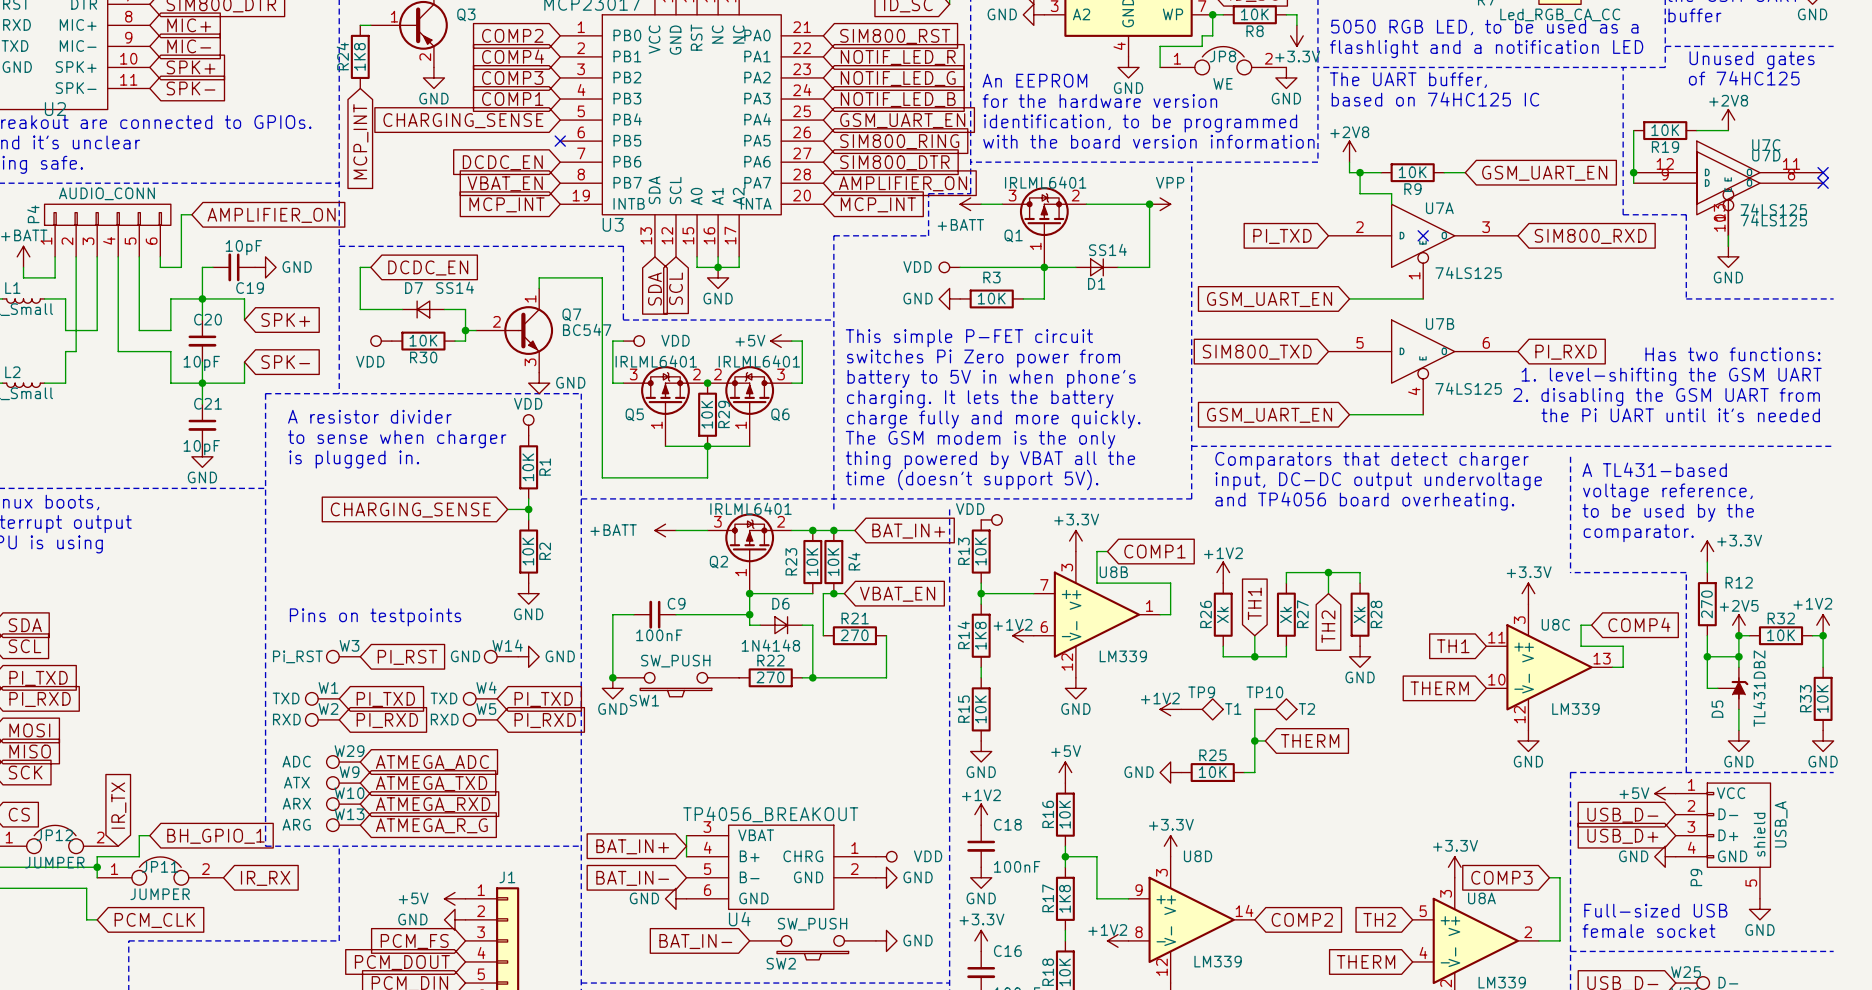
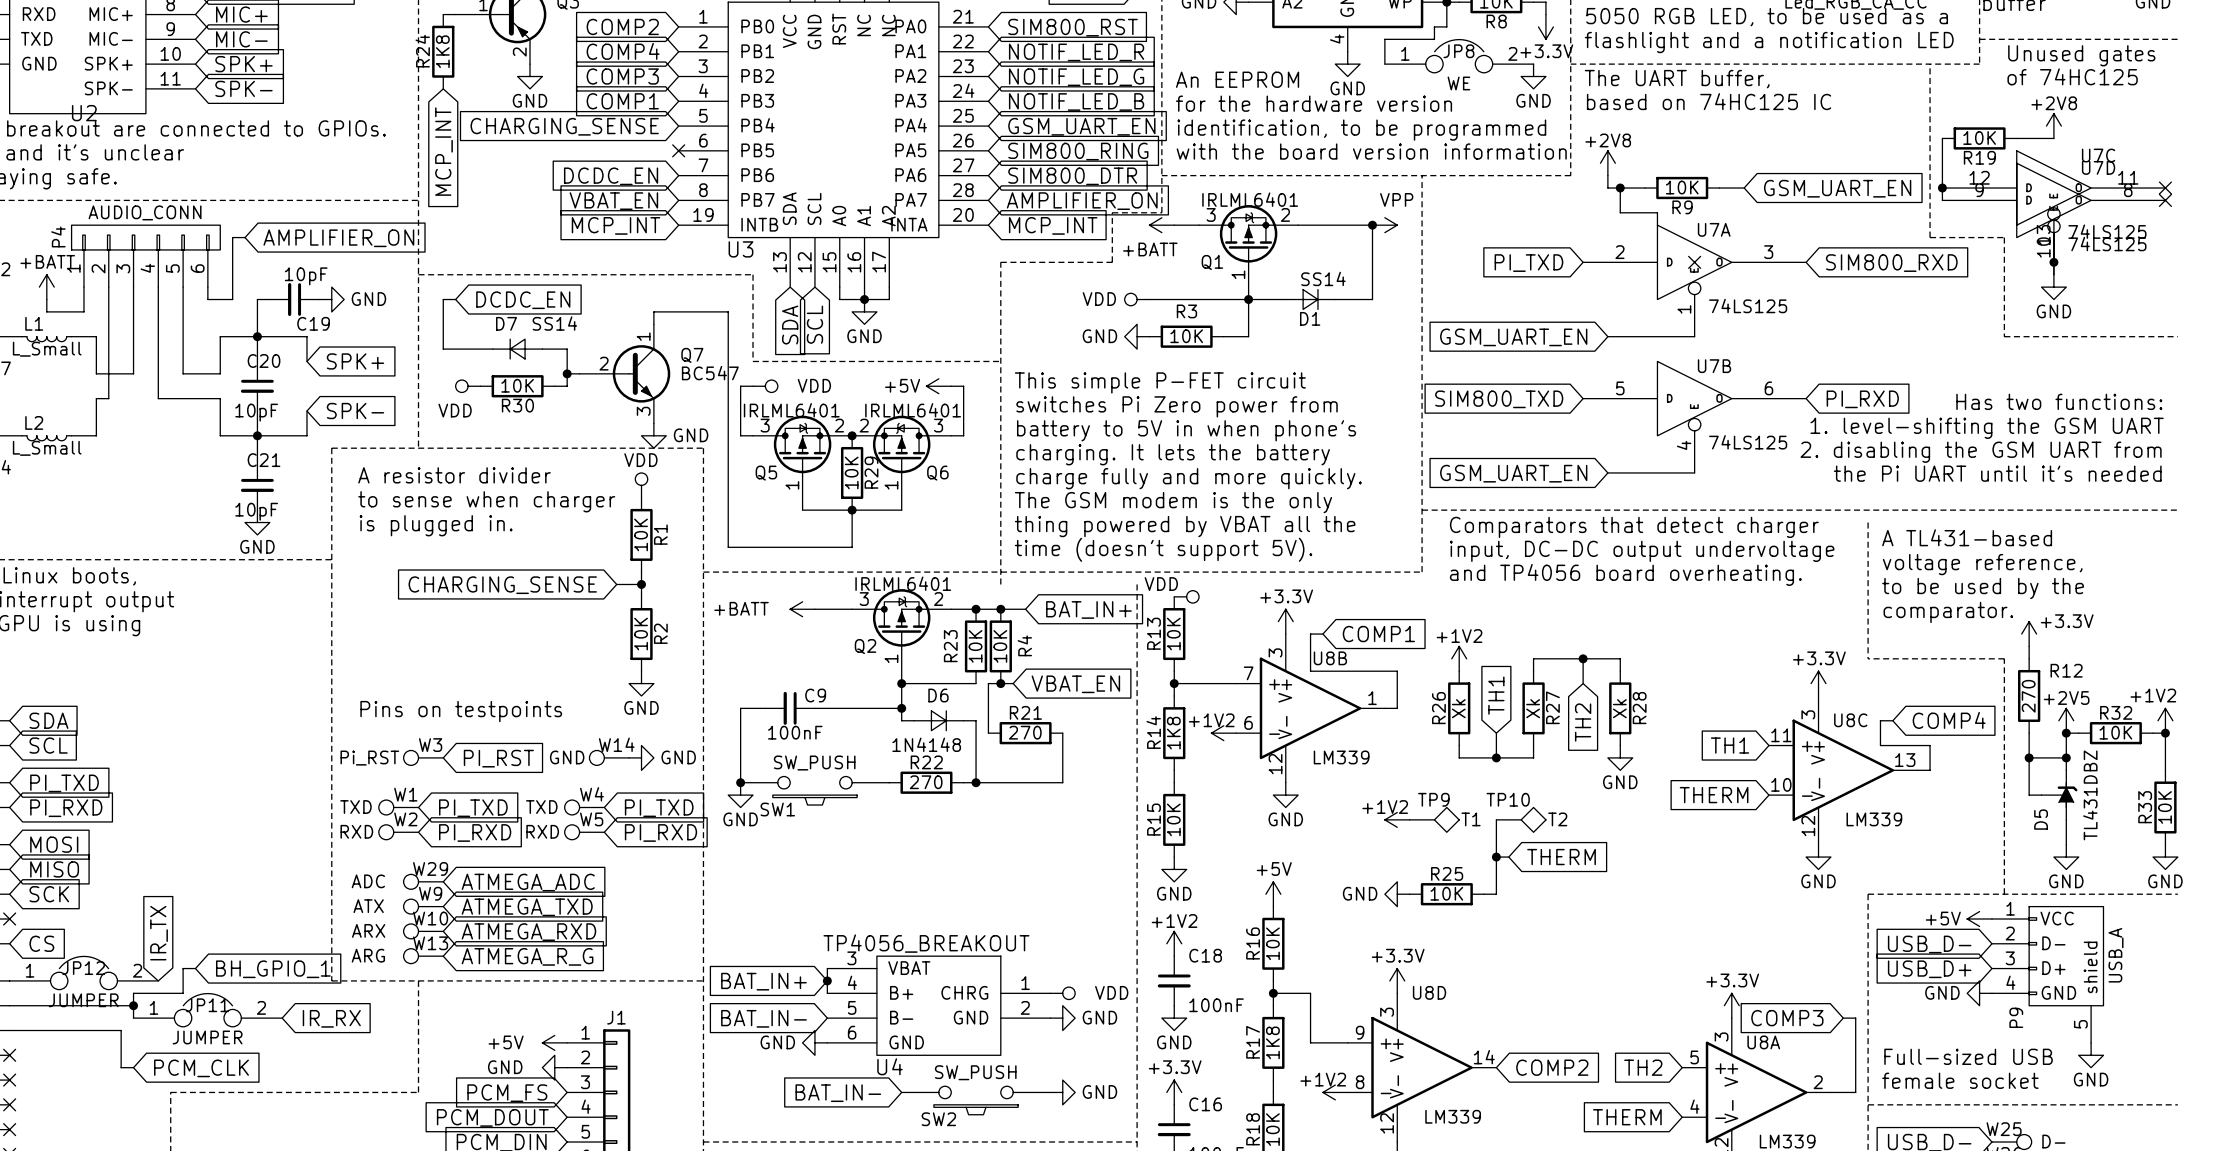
junction: none -> (2053, 262)
junction: none -> (827, 980)

